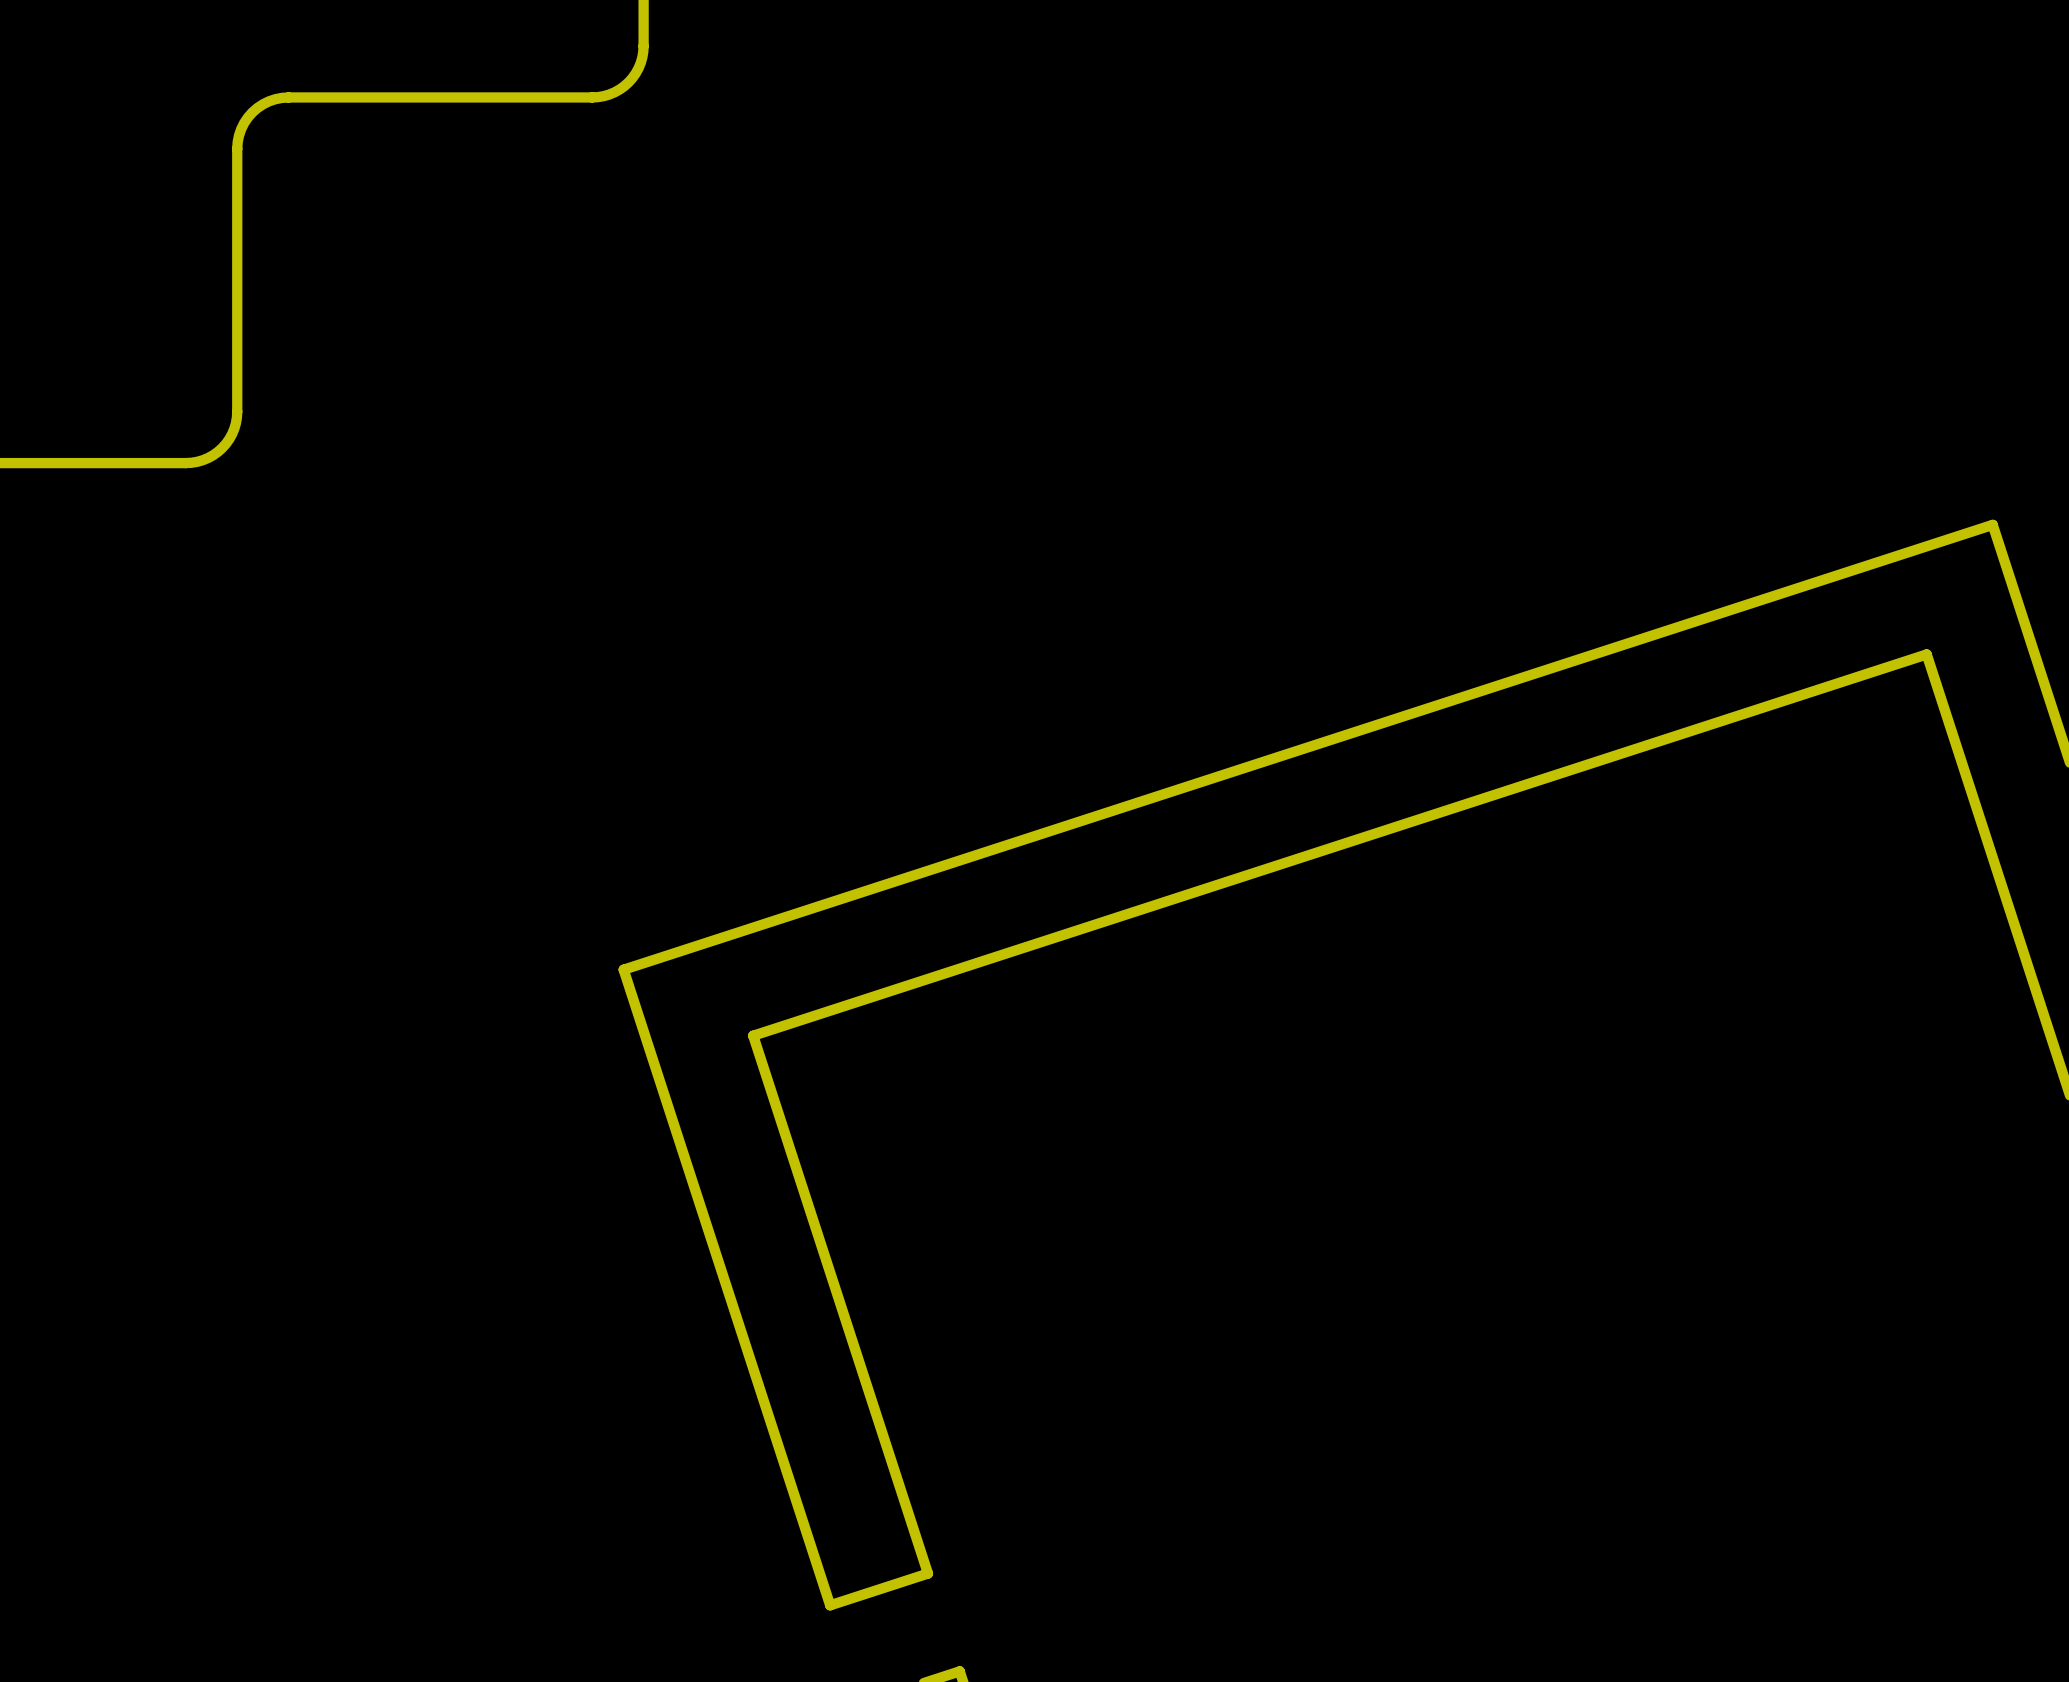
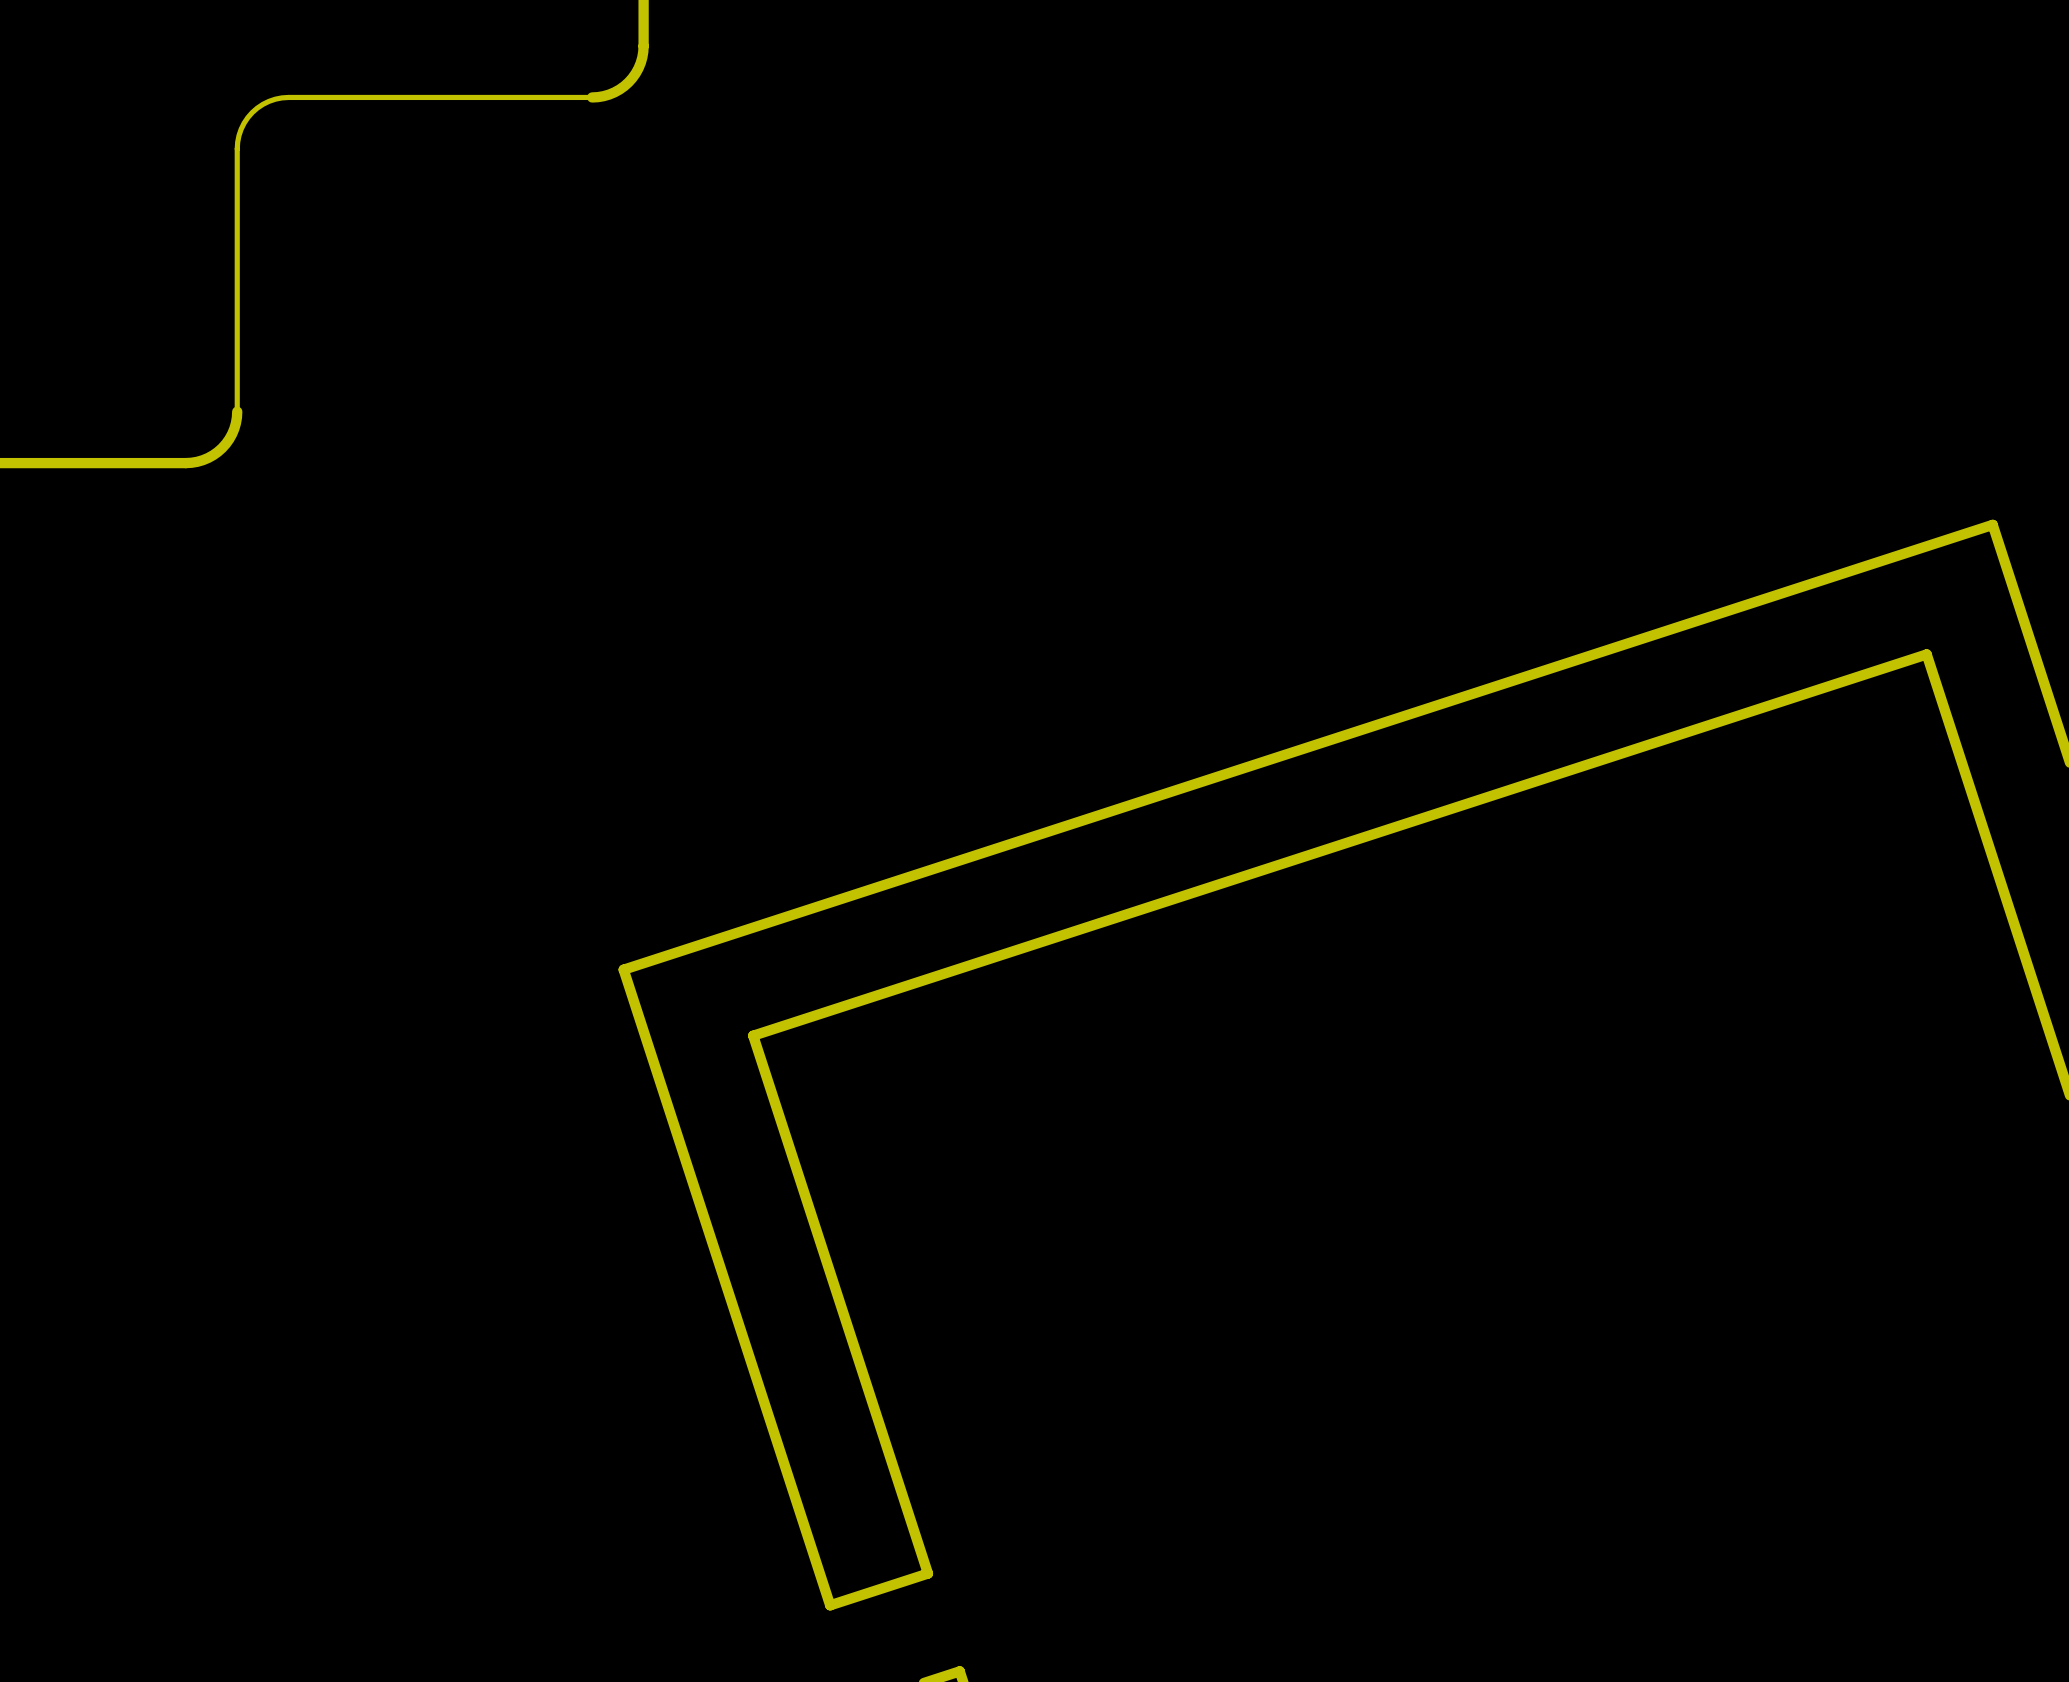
board edge width: thick (592, 97) (288, 97) (268, 101) (252, 112) (241, 129) (237, 148) (237, 411) -> thin (592, 97) (288, 97) (268, 101) (252, 112) (241, 129) (237, 148) (237, 411)

